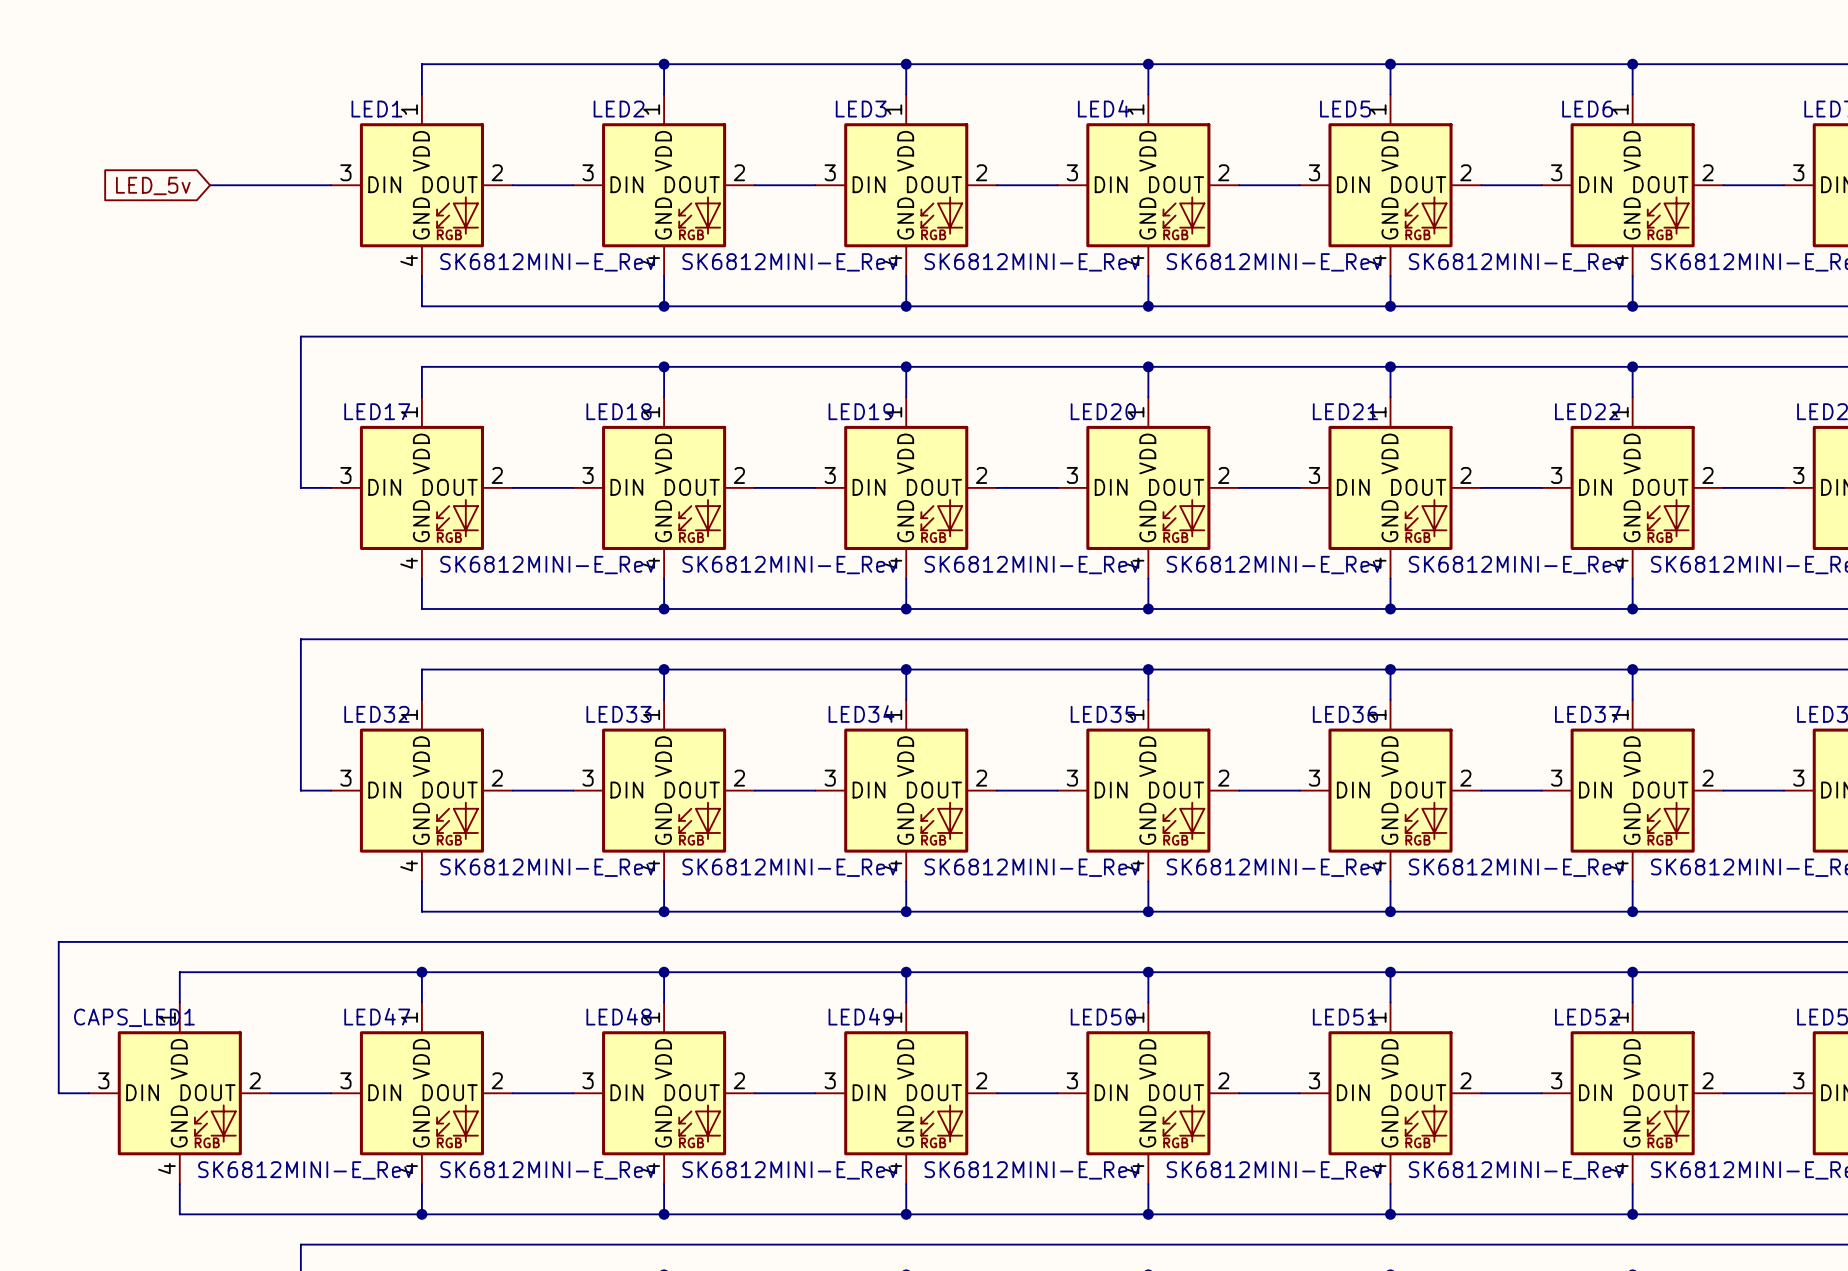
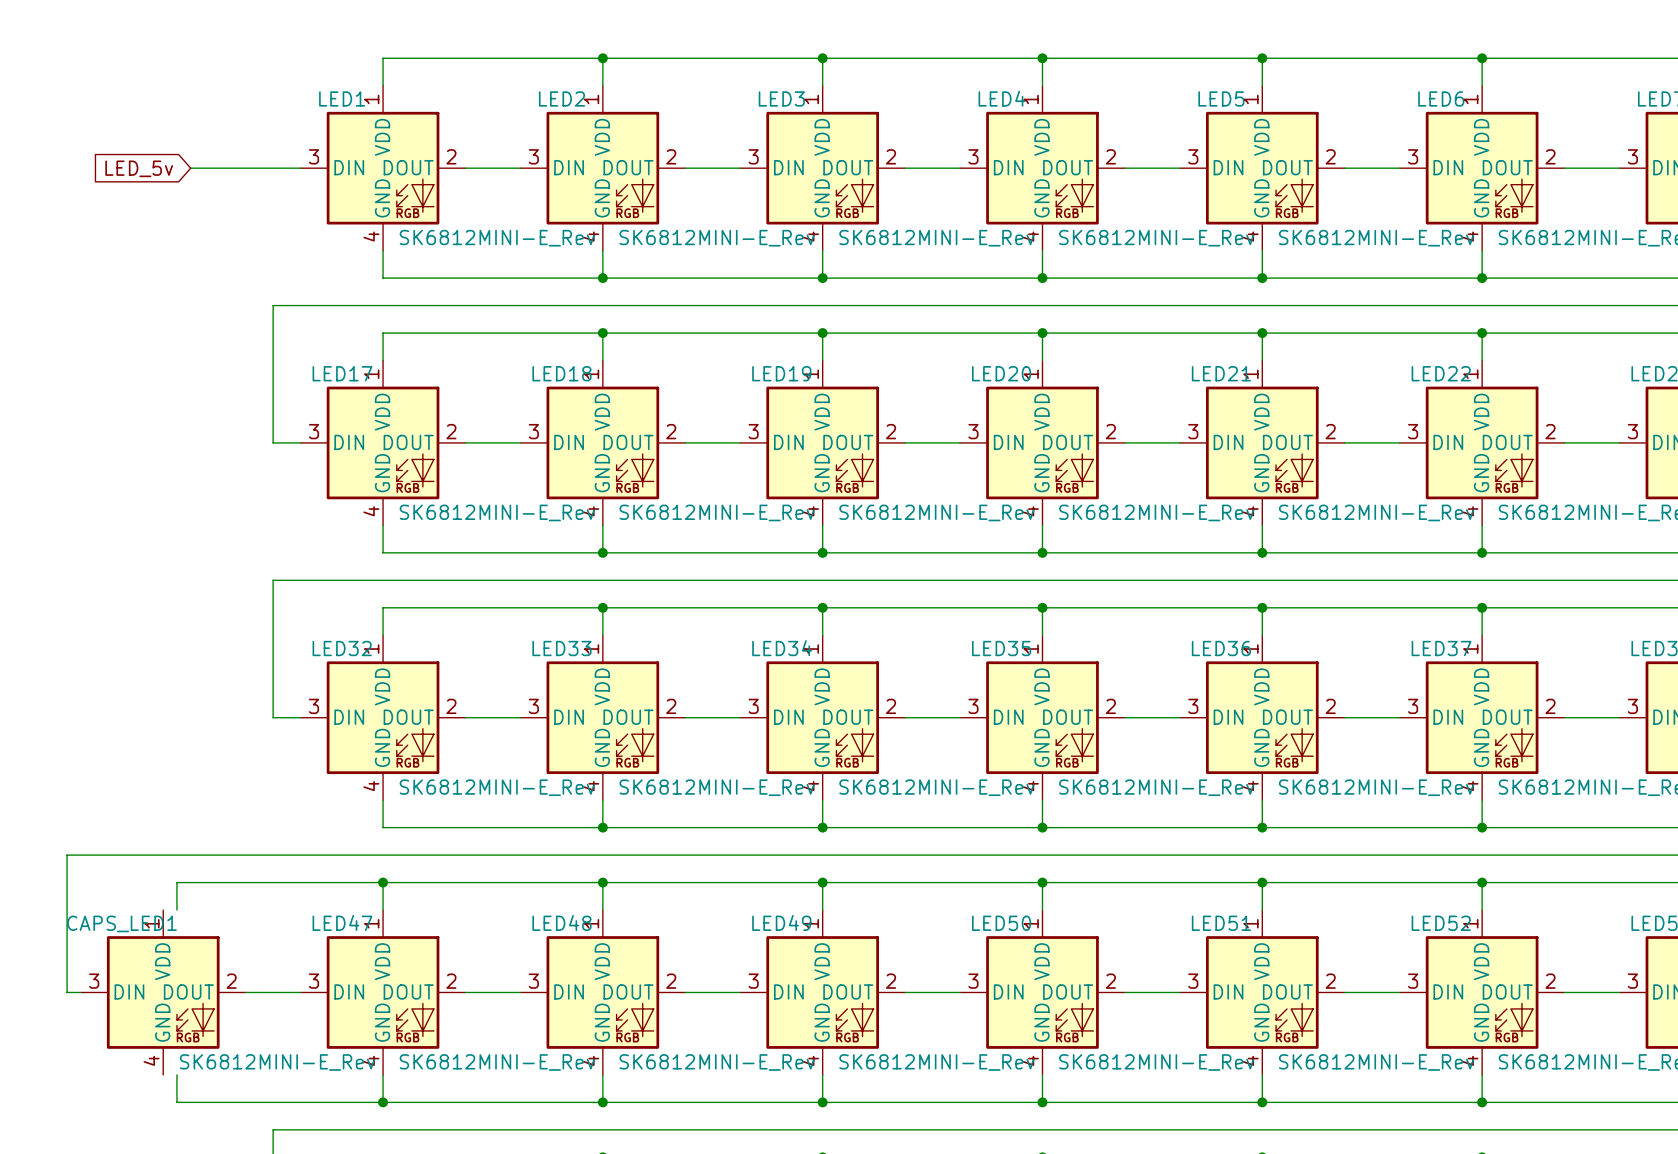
wire: (73, 941) (58, 941) (58, 1093) (73, 1093) -> (67, 855) (67, 992)
wire: (194, 972) (179, 972) (179, 1002) -> (176, 882) (176, 910)
wire: (179, 1184) (179, 1214) (194, 1214) -> (176, 1074) (176, 1102)

